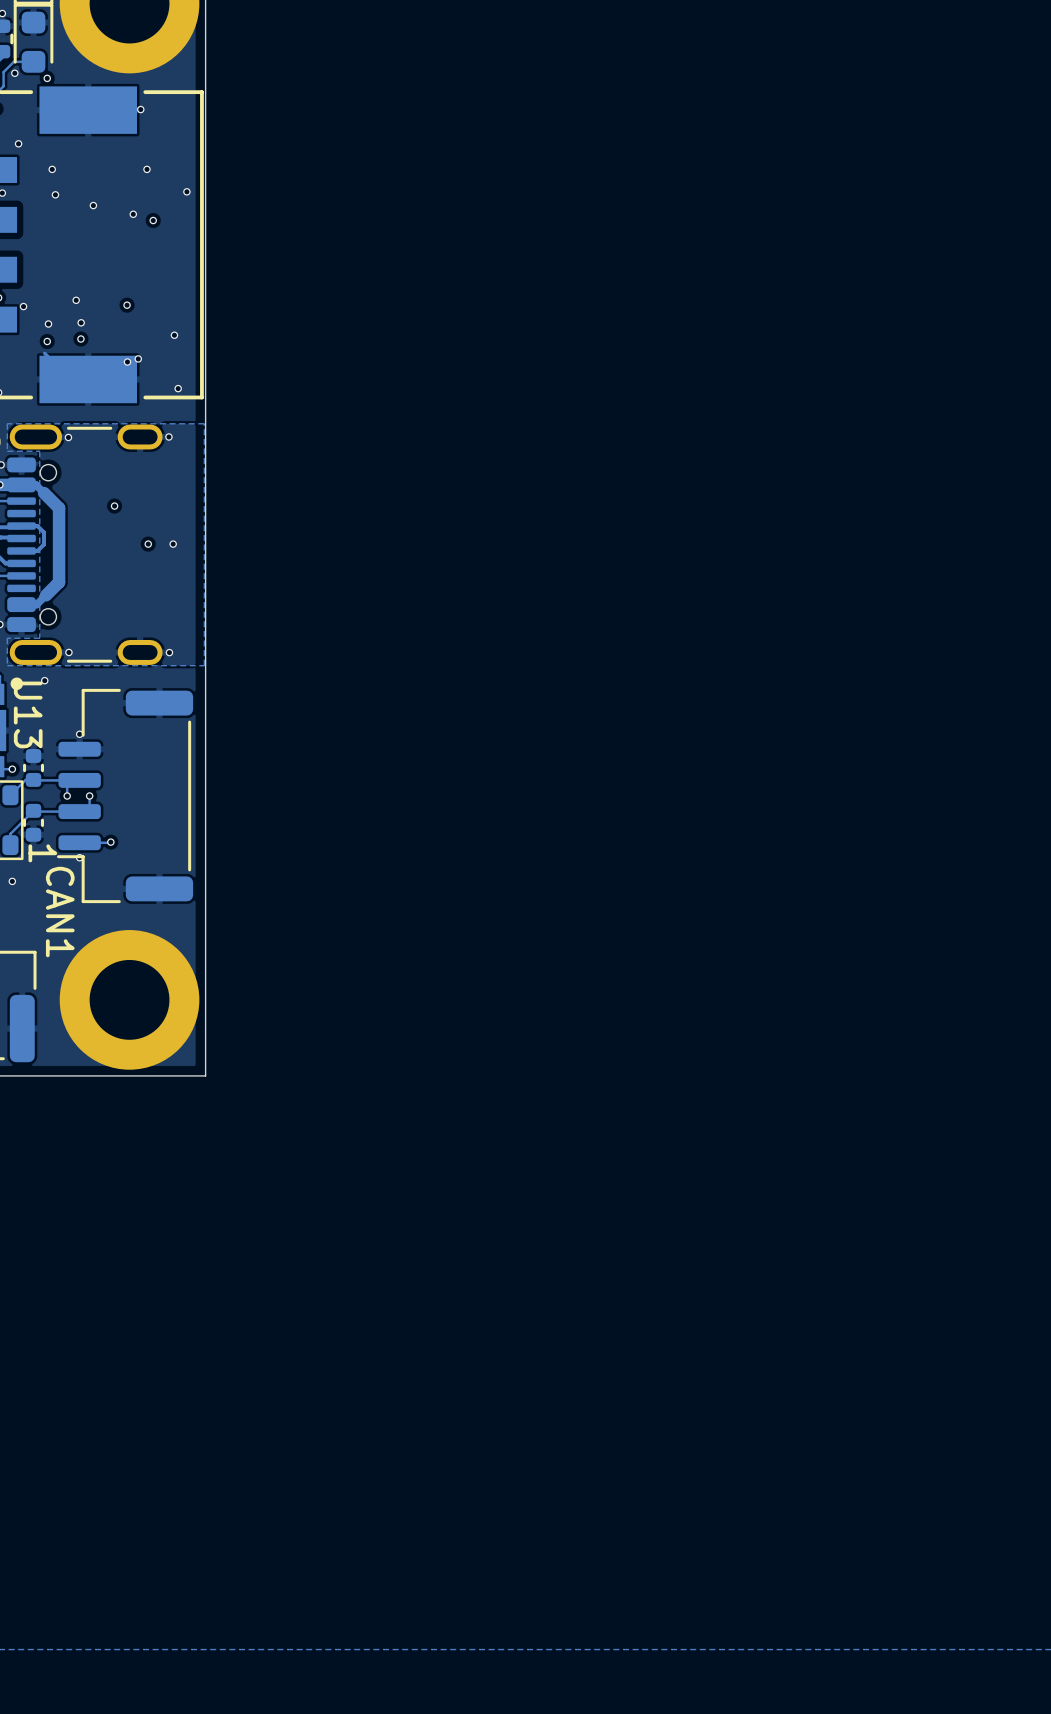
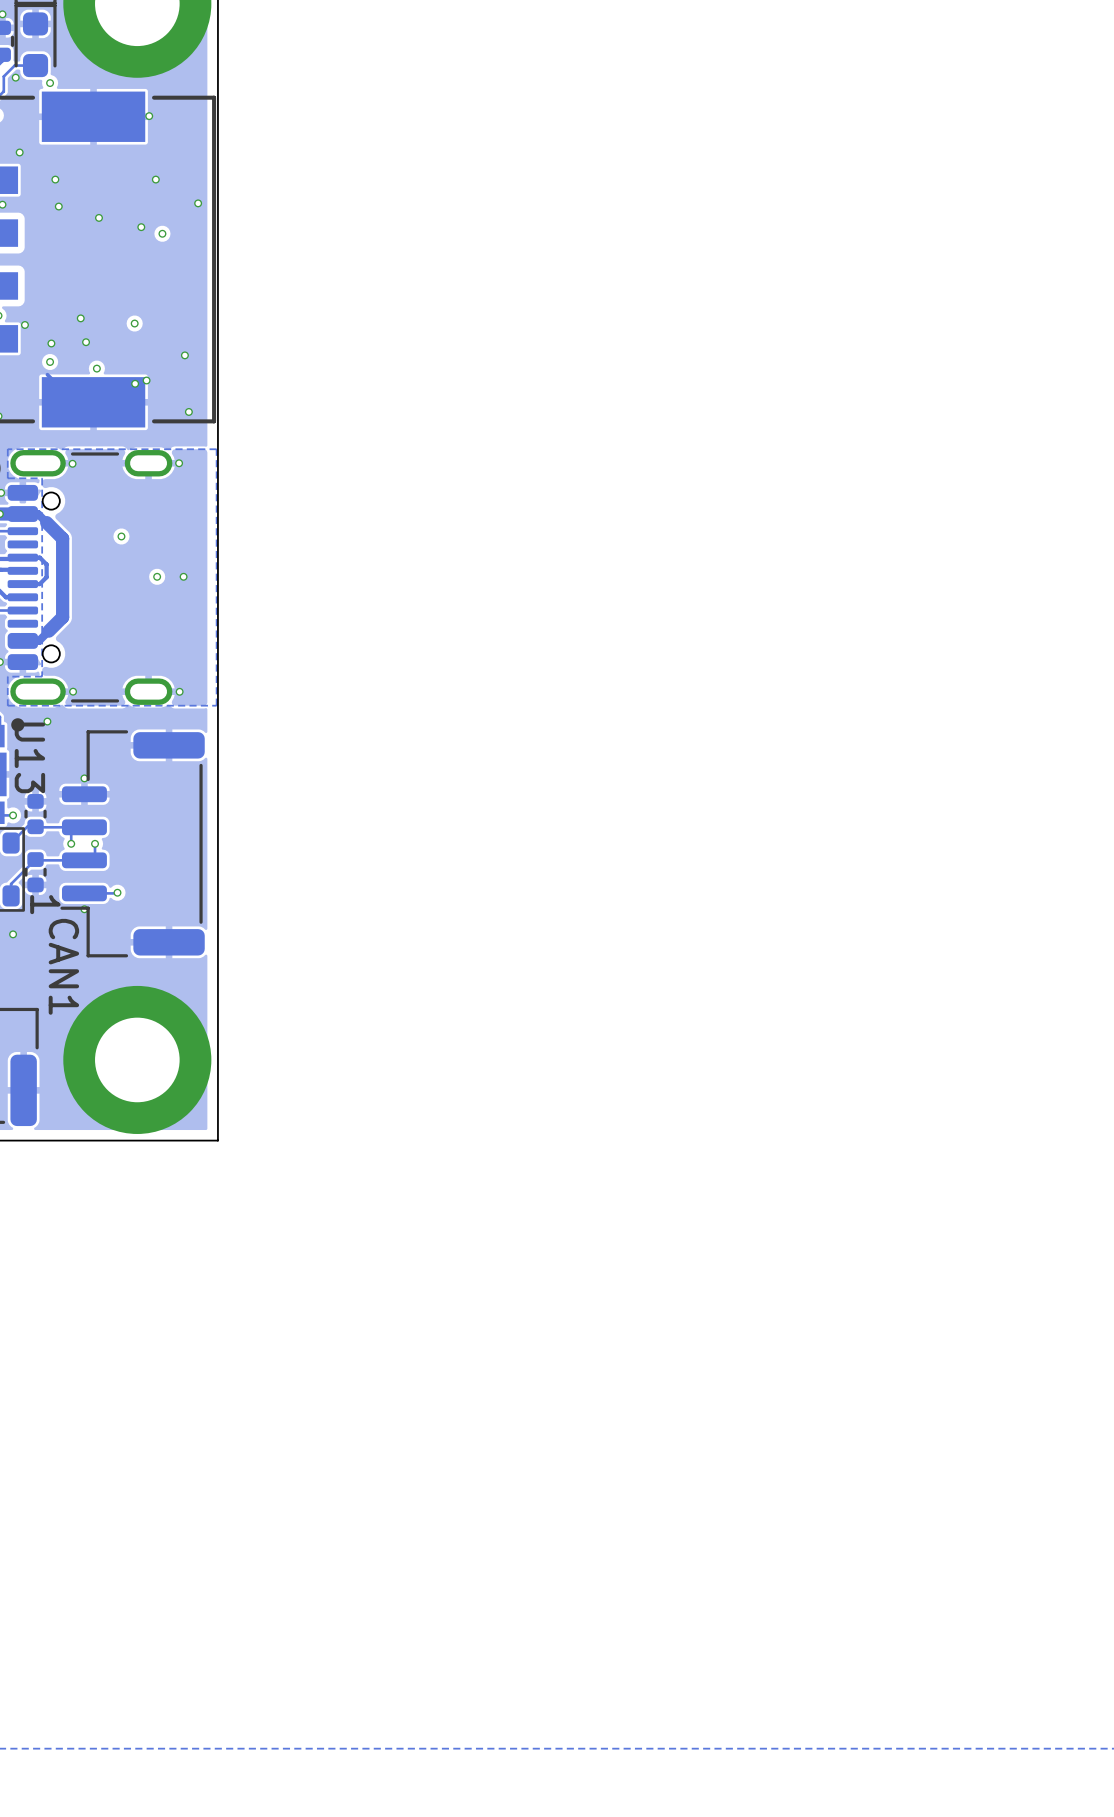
via position: (80, 339) -> (96, 368)

